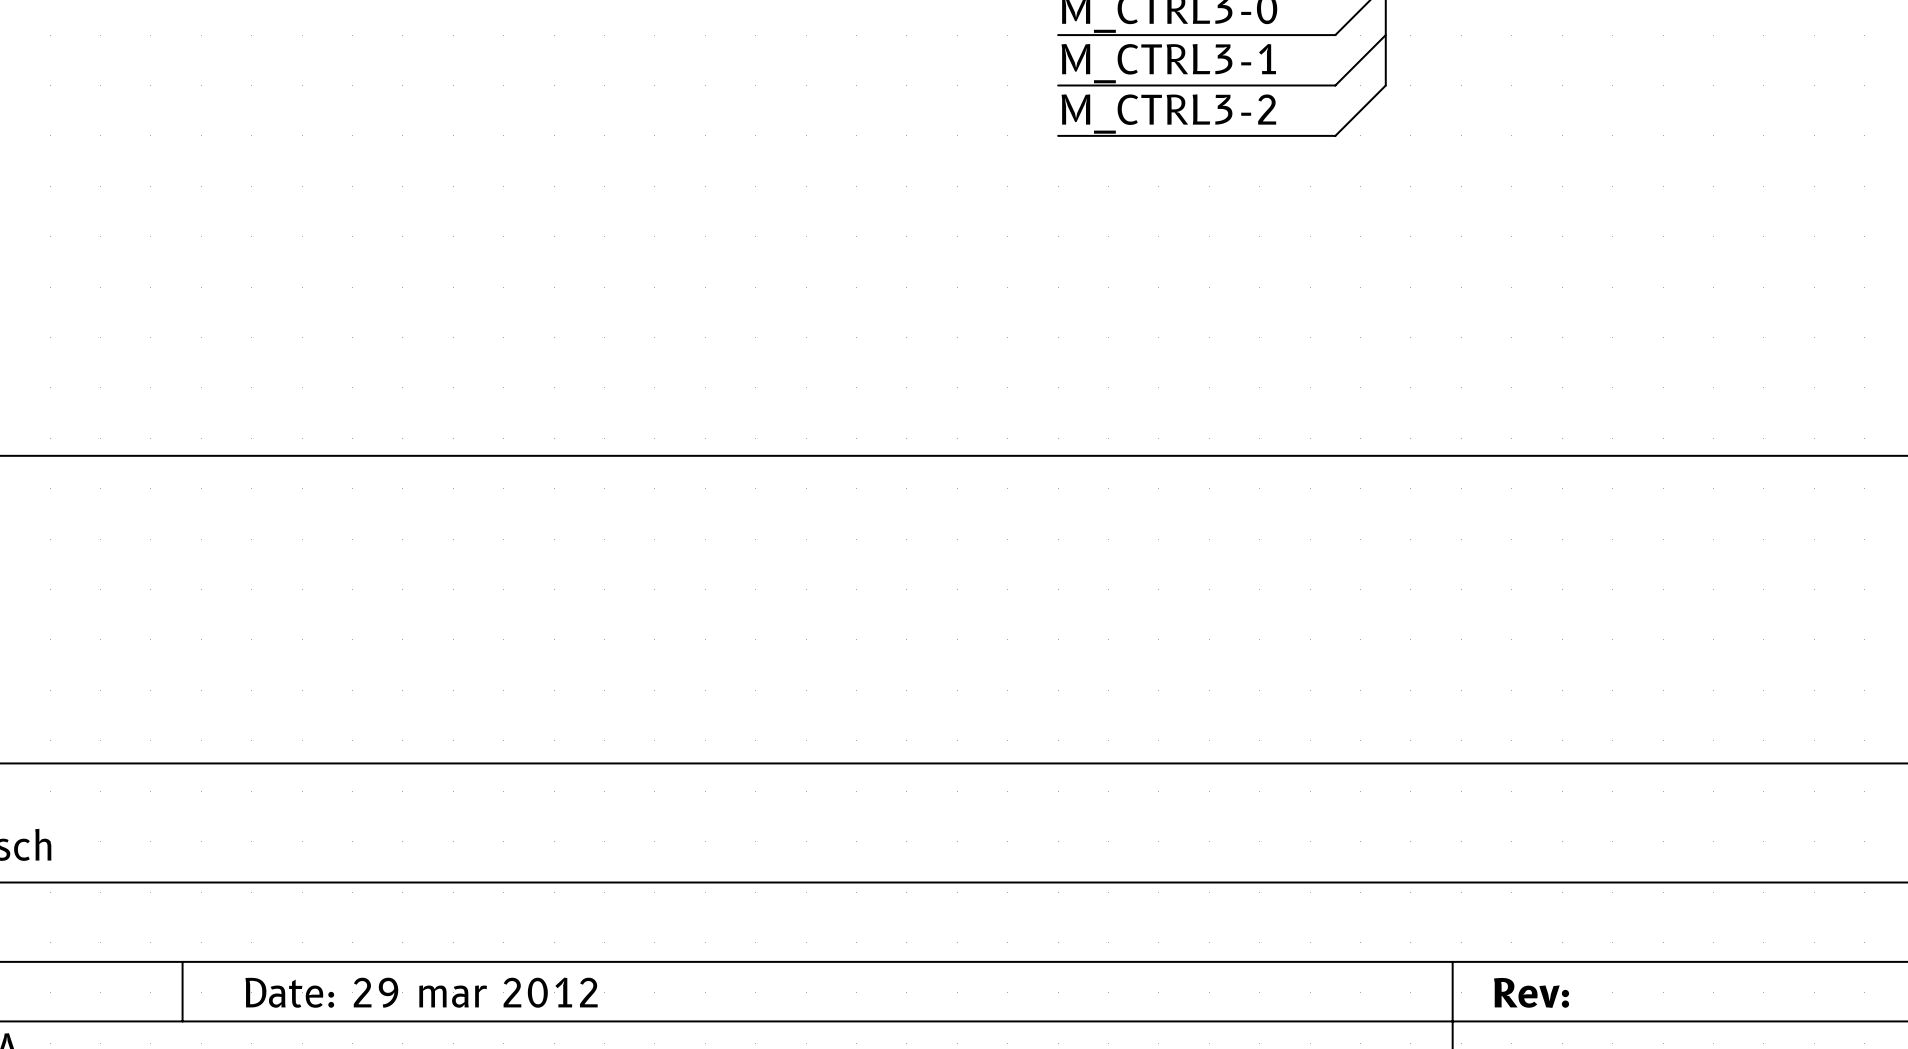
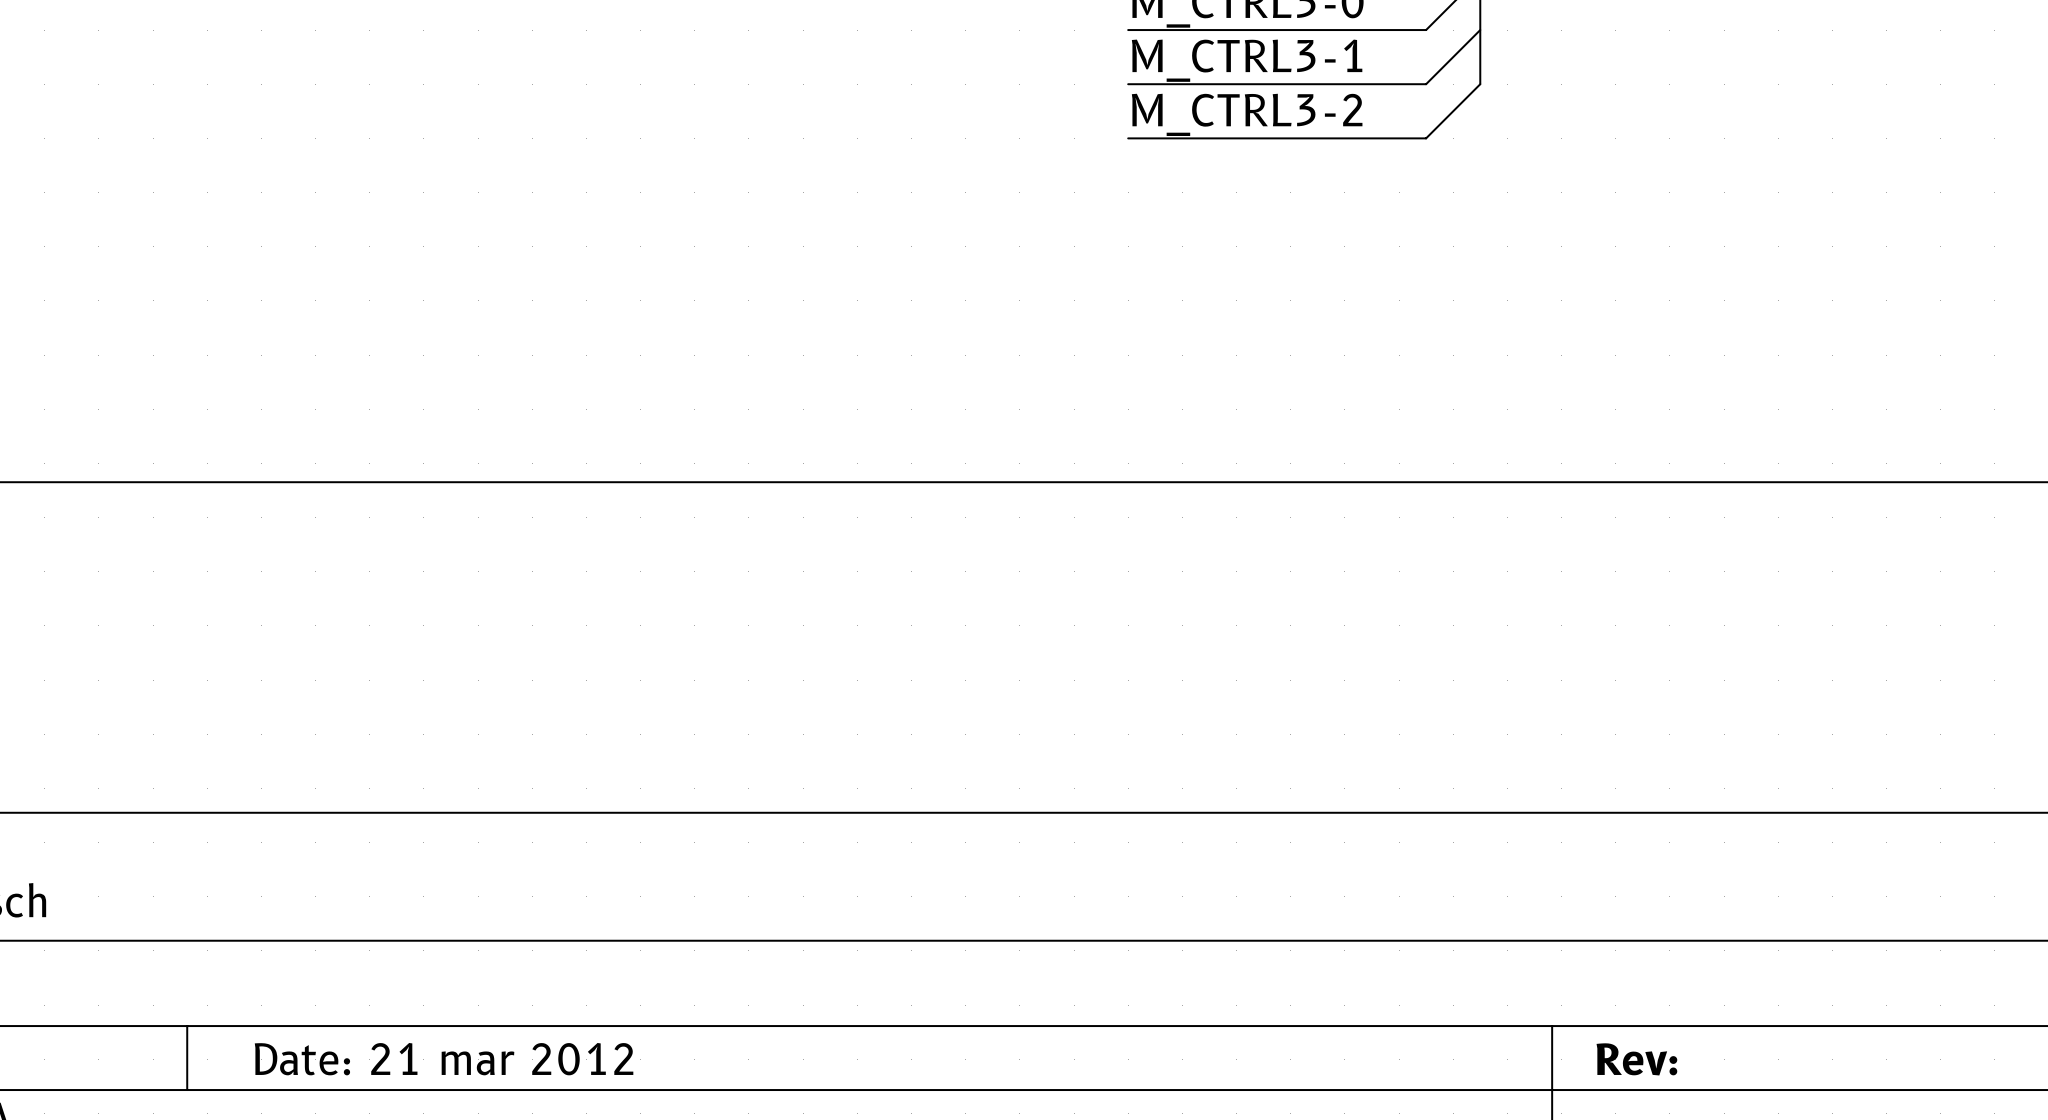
title block: Date: 29 mar 2012 (421, 992) -> Date: 21 mar 2012 (444, 1059)

